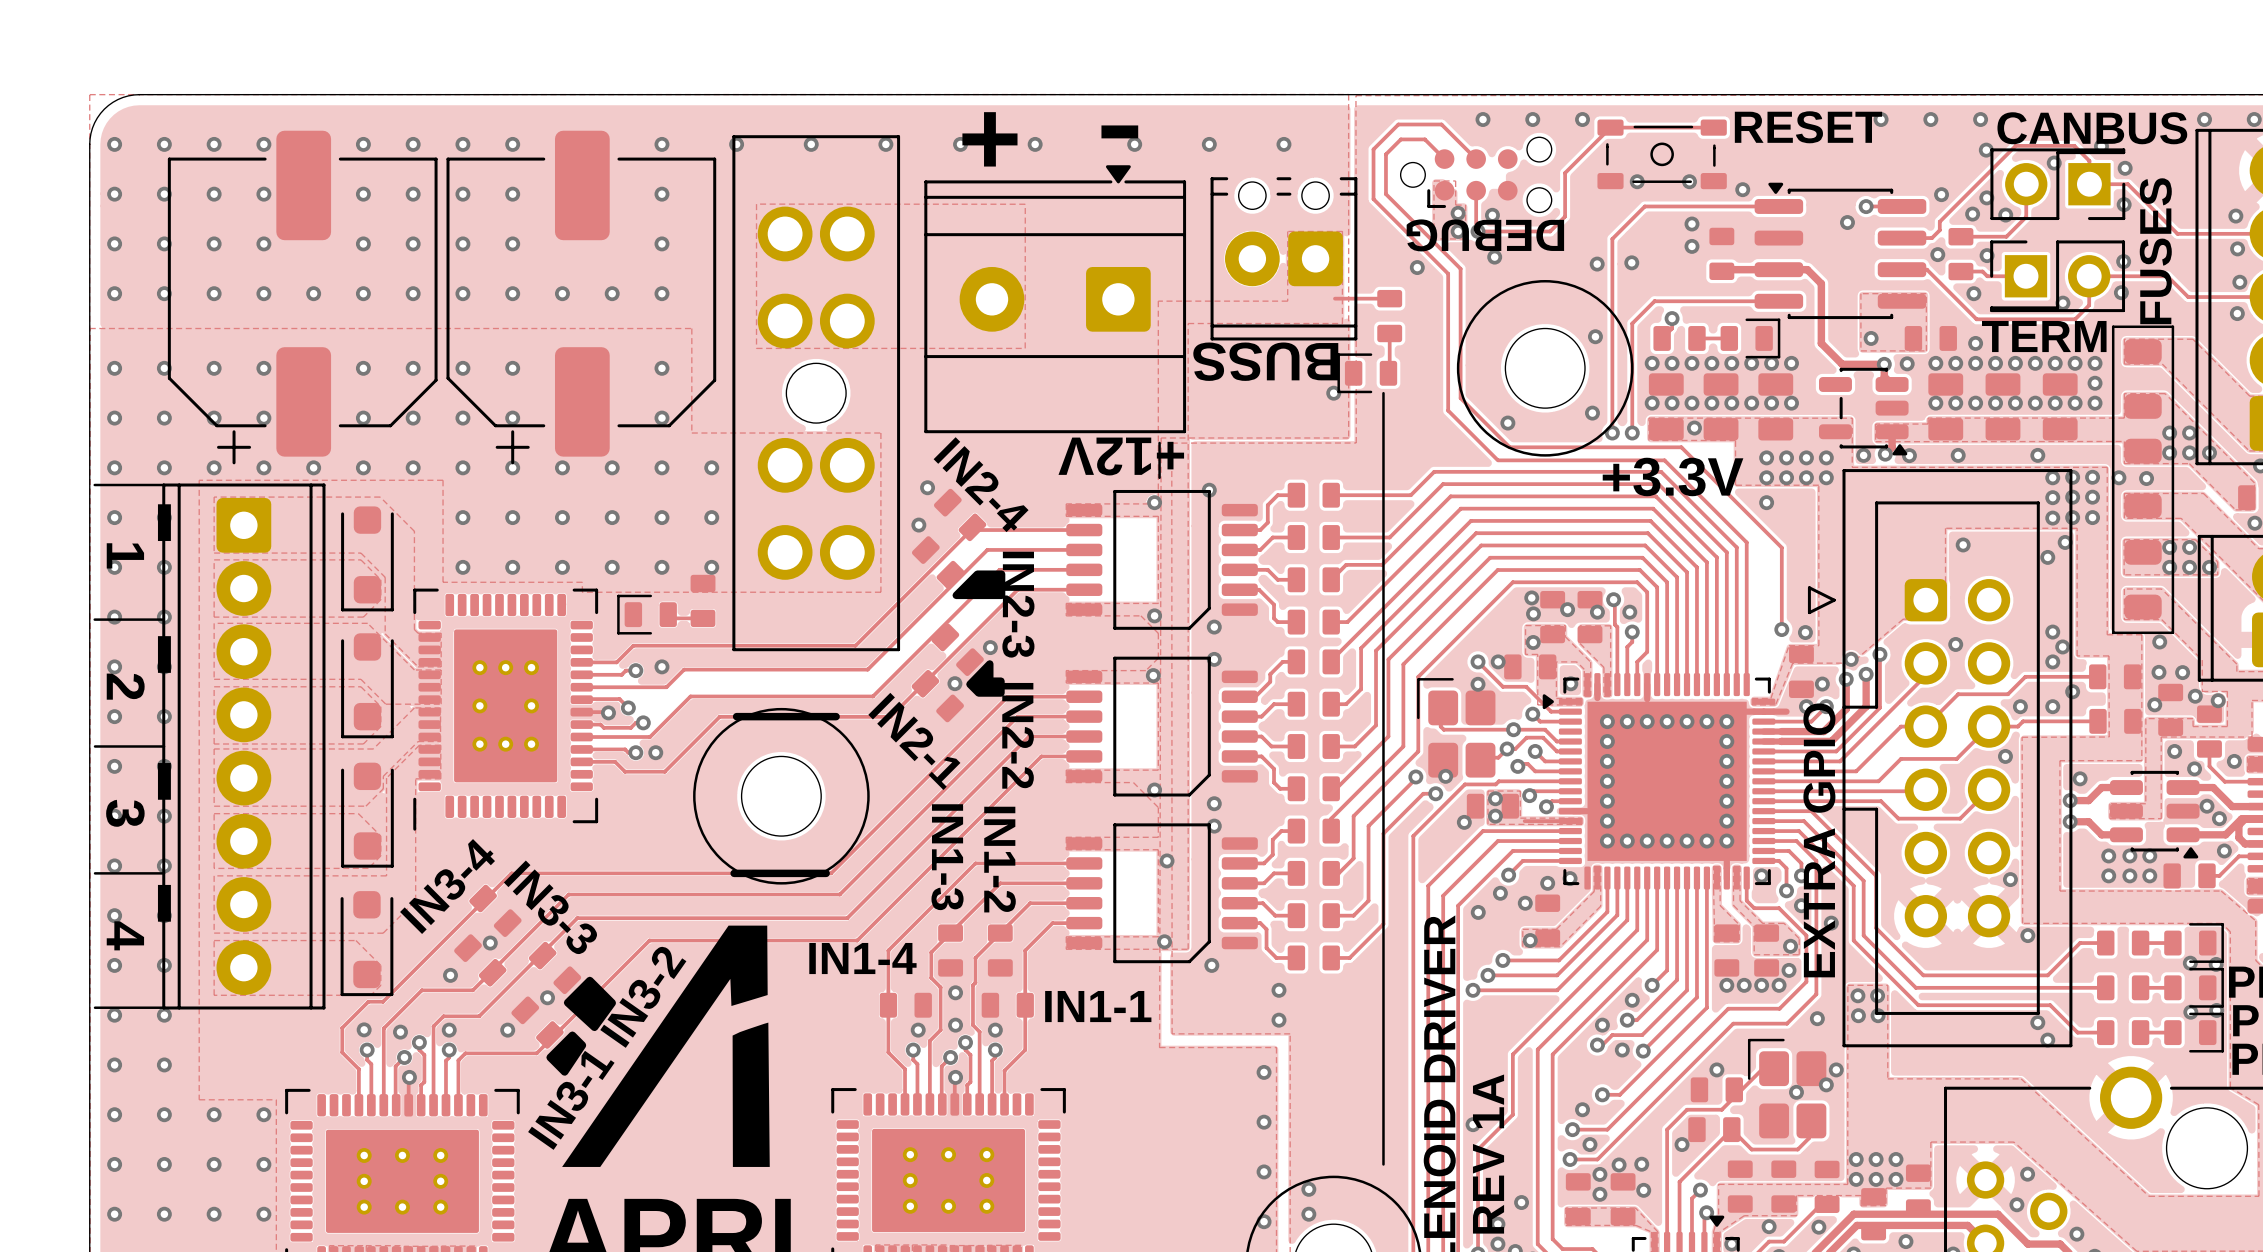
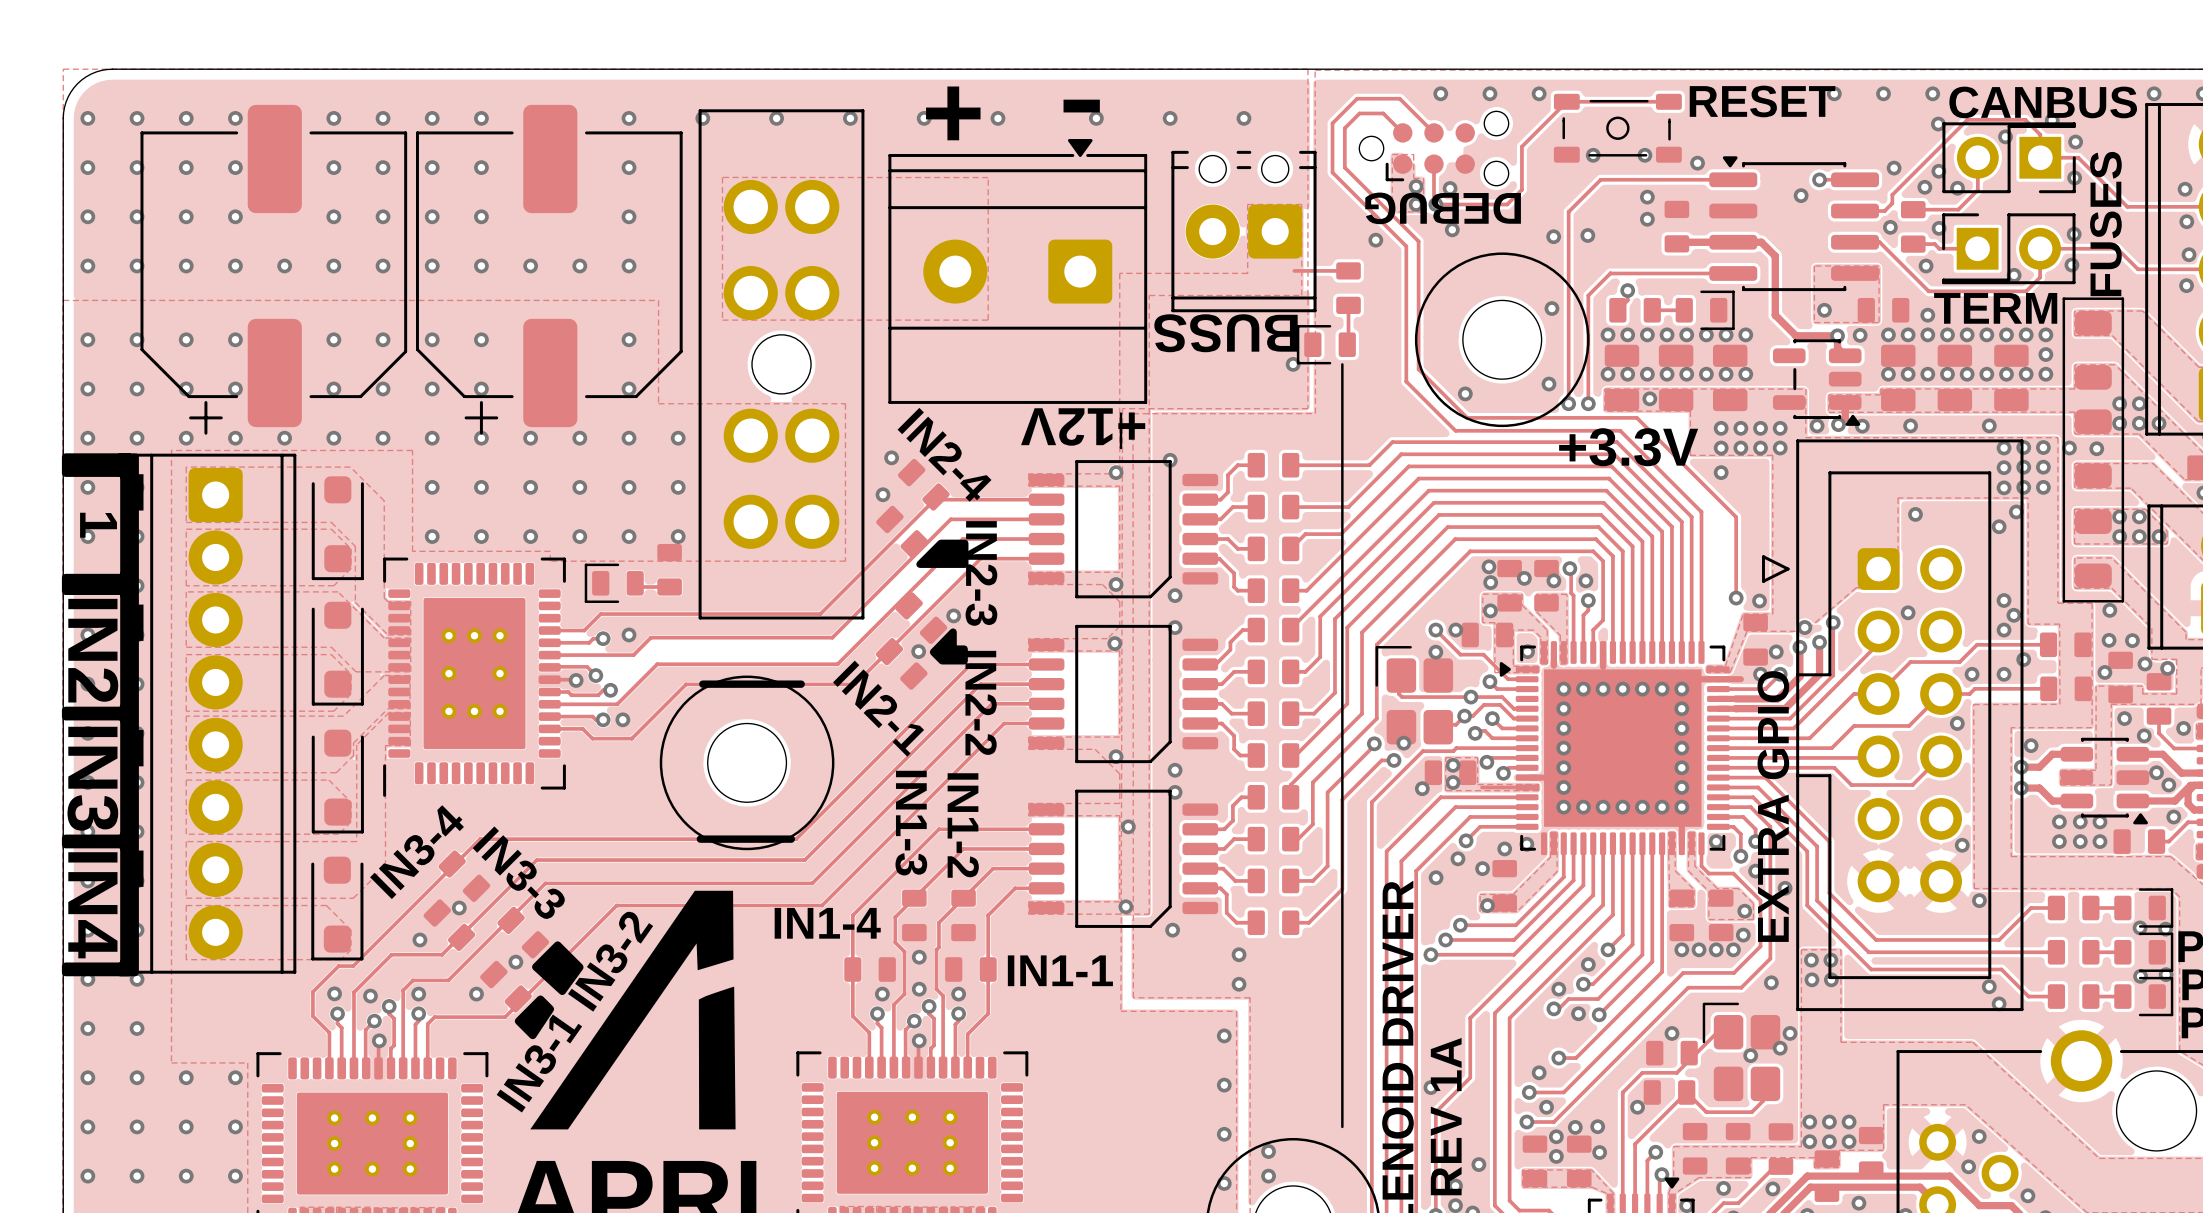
drawing: none -> [61, 453, 139, 977]
line: (94, 485) (163, 485) -> none
line: (94, 619) (163, 619) -> none
text: 2 (125, 686) -> IN2 (93, 650)
line: (95, 746) (164, 746) -> none
text: 3 (125, 813) -> IN3 (92, 778)
line: (95, 873) (164, 873) -> none
text: 4 (125, 935) -> IN4 (92, 905)
line: (95, 1007) (164, 1007) -> none

